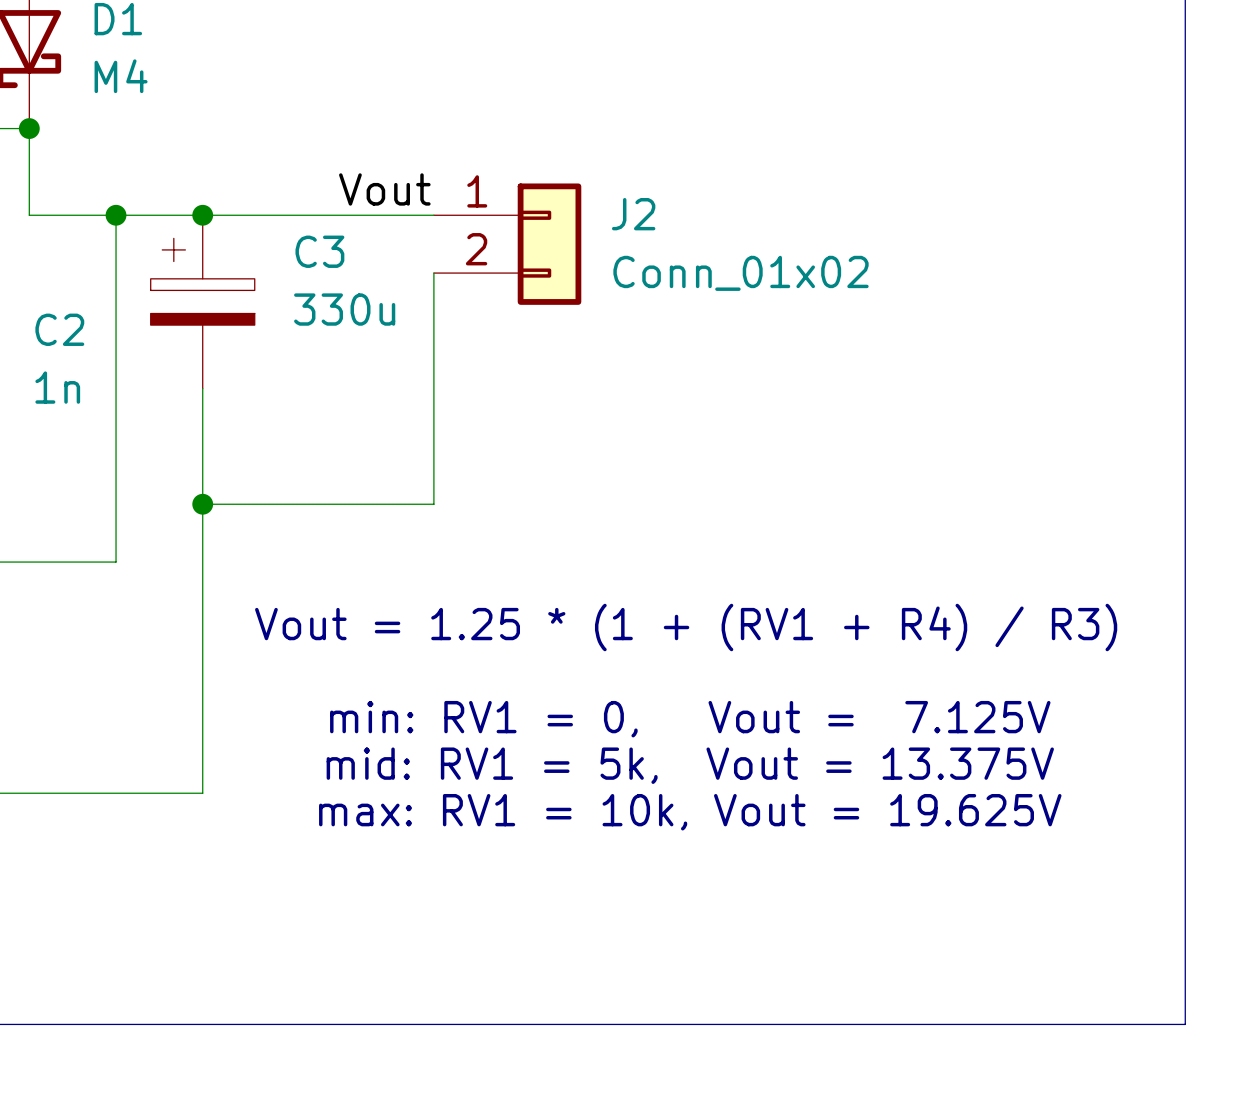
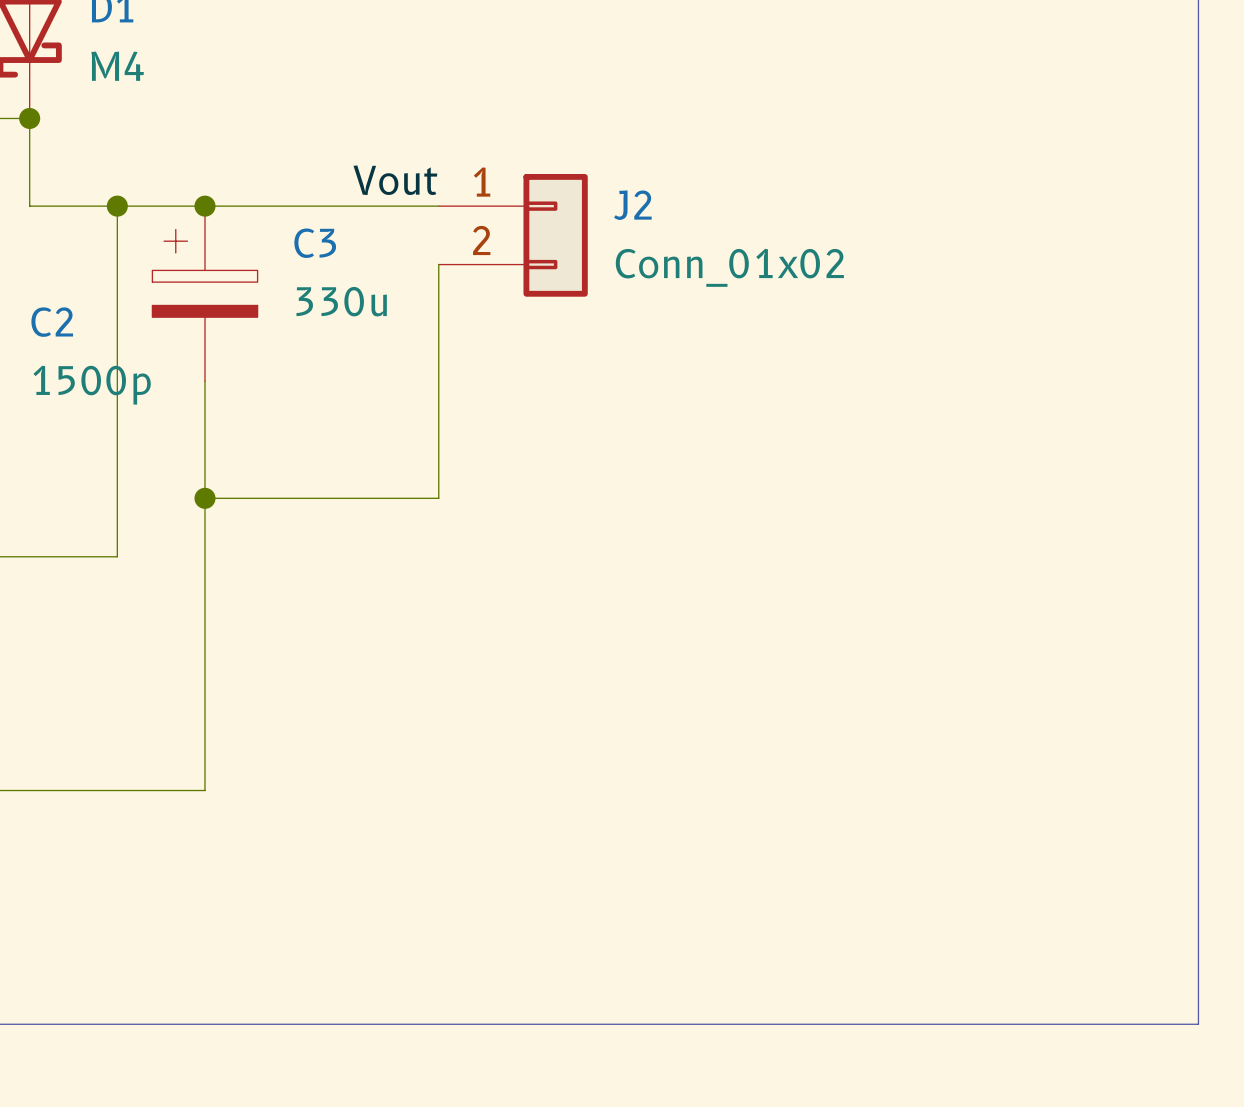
C2 value: 1n (57, 387) -> 1500p (92, 385)
text: Vout = 1.25 * (1 + (RV1 + R4) / R3) (686, 627) -> none
text: min: RV1 = 0, Vout = 7.125V (690, 719) -> none
text: mid: RV1 = 5k, Vout = 13.375V (690, 765) -> none
text: max: RV1 = 10k, Vout = 19.625V (690, 812) -> none

